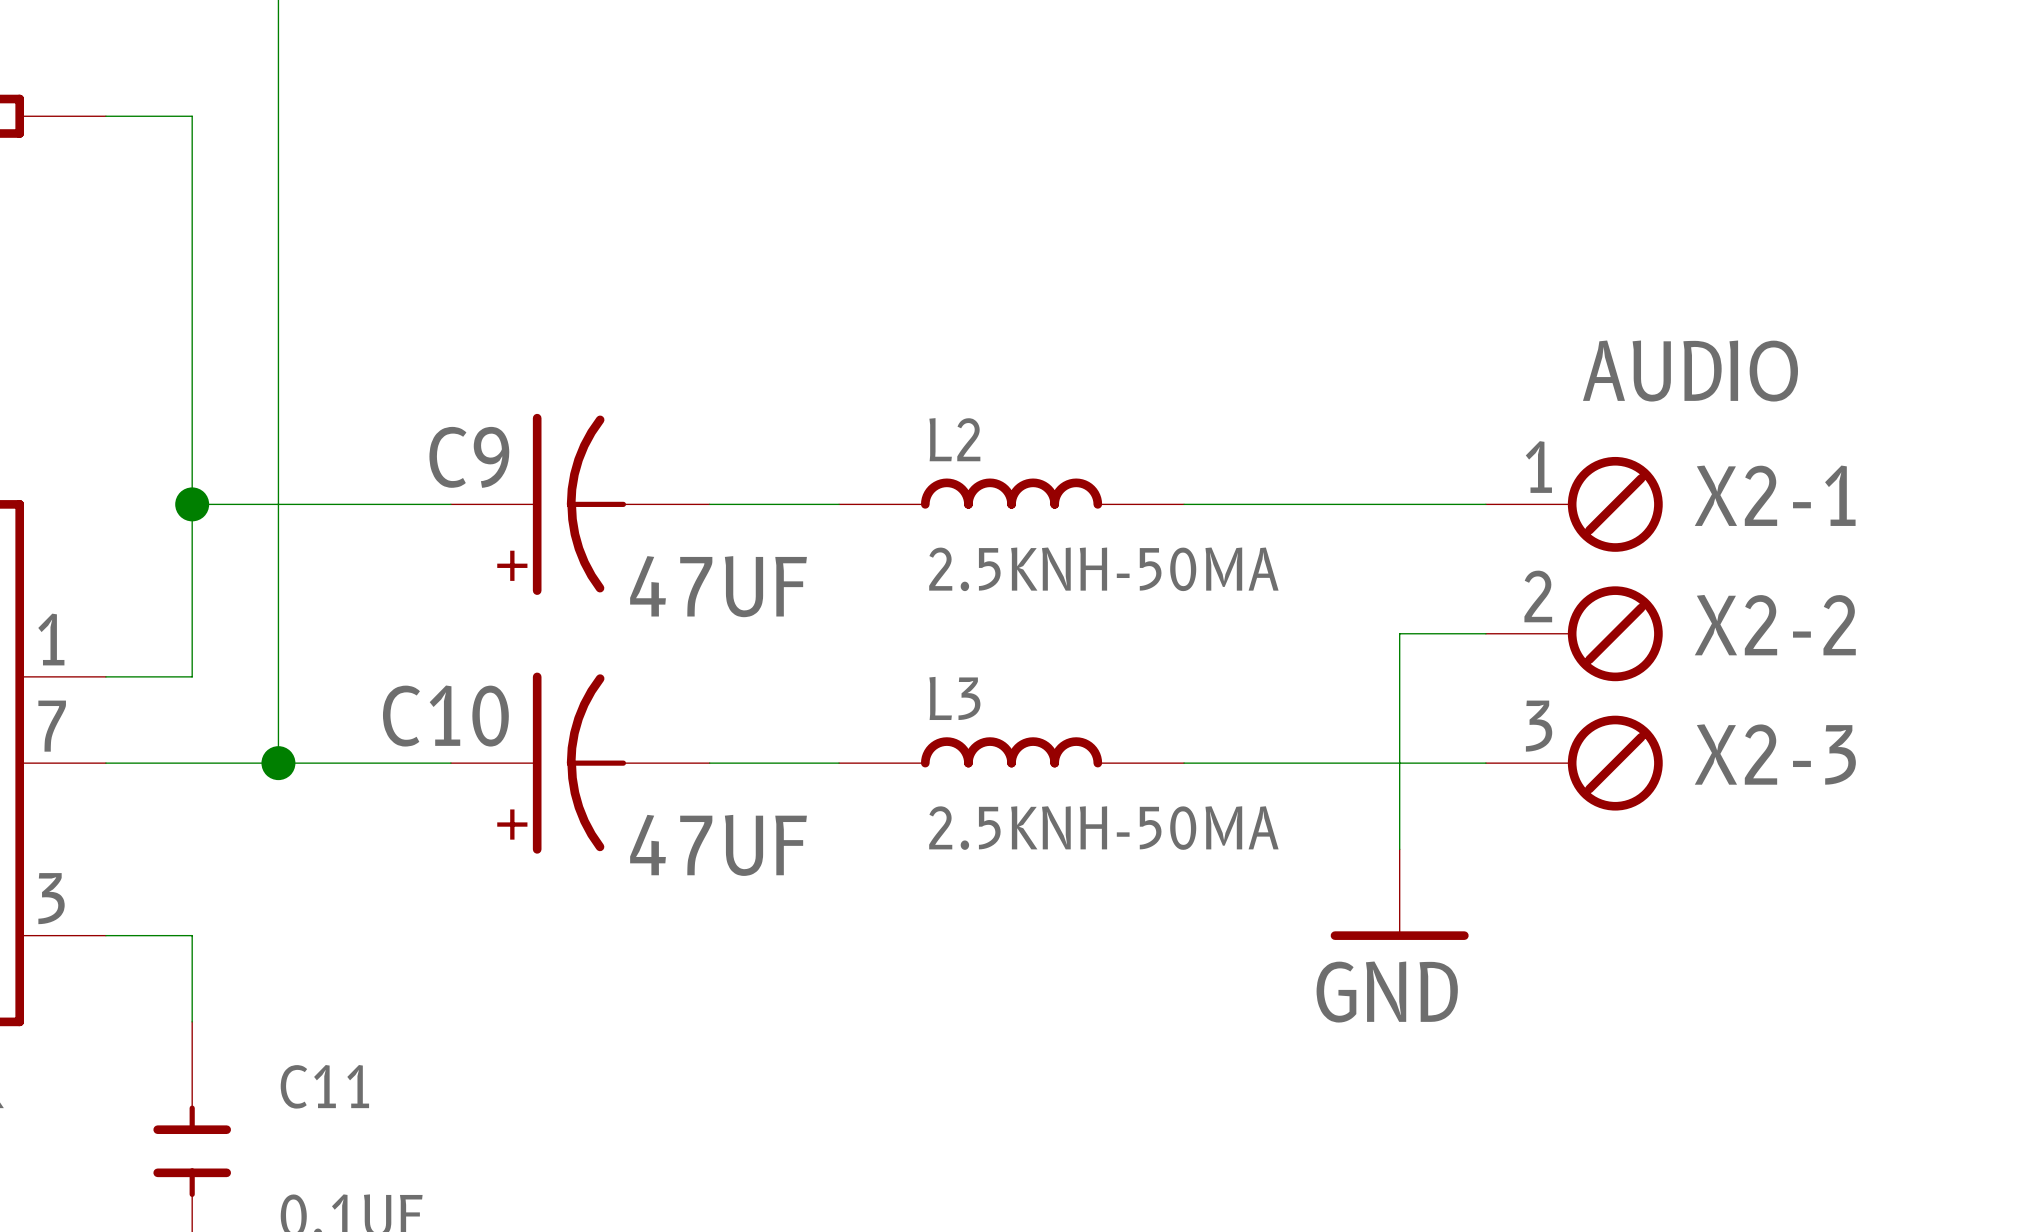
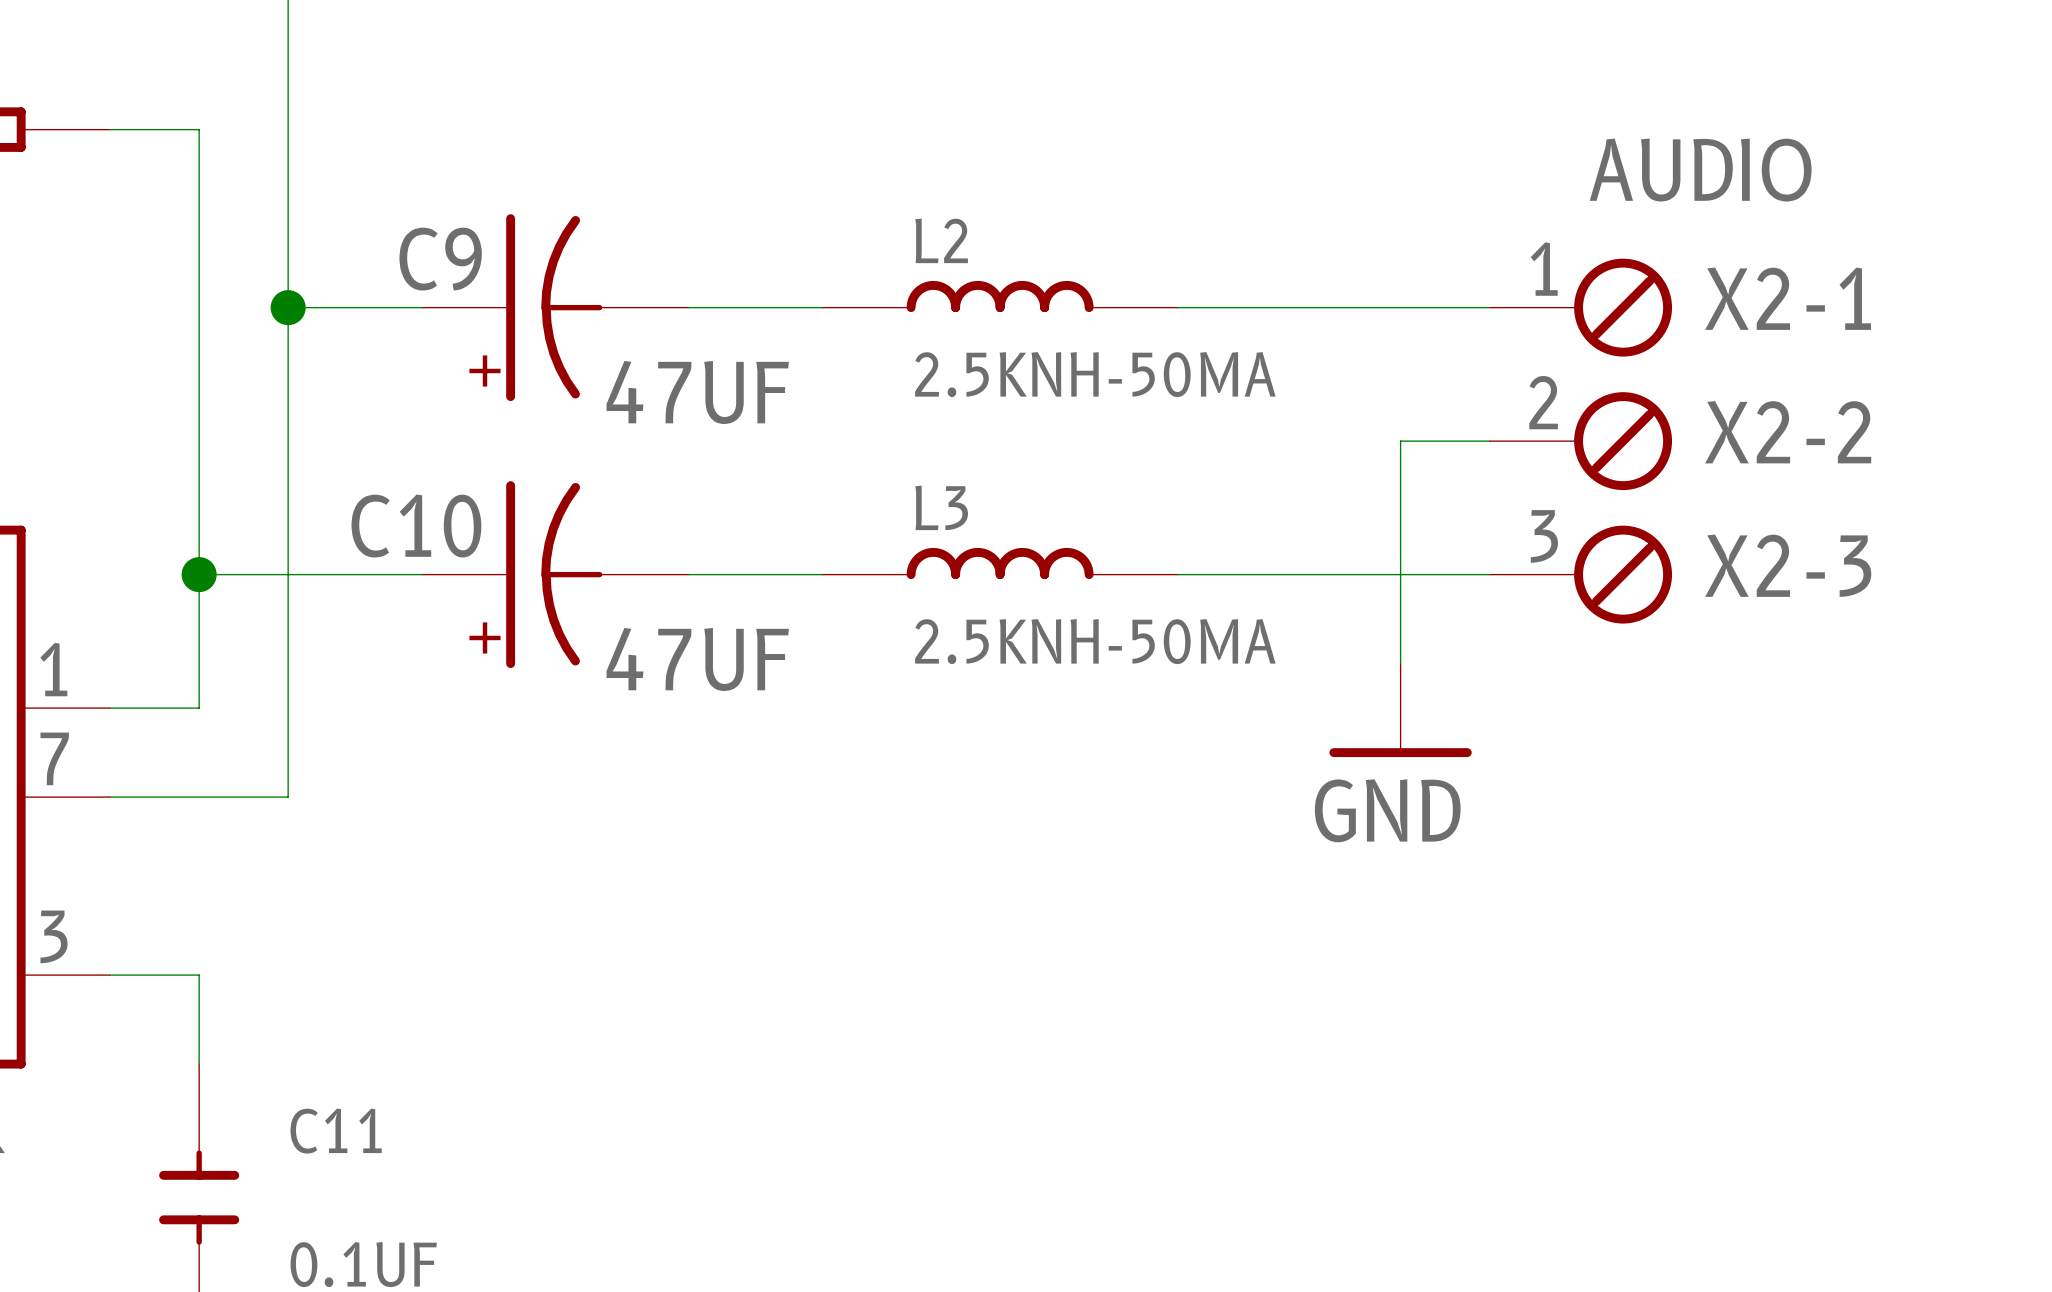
wire: none -> (288, 307) (421, 307)
junction: none -> (288, 307)
L2 position: (1011, 493) -> (1000, 296)
wire: (192, 504) (450, 504) -> none
junction position: (192, 504) -> (199, 574)
C9 position: (580, 504) -> (555, 307)
wire: (709, 504) (839, 504) -> (688, 307) (822, 307)
wire: (1184, 504) (1485, 504) -> (1178, 307) (1489, 307)
X2-1 position: (1574, 504) -> (1580, 307)
wire: none -> (199, 574) (421, 574)
wire: (1485, 633) (1399, 633) (1399, 849) -> (1489, 441) (1400, 441) (1400, 663)
X2-2 position: (1574, 633) -> (1580, 441)
L3 position: (1011, 752) -> (1000, 563)
wire: (278, 763) (450, 763) -> none
junction: (278, 763) -> none
C10 position: (580, 763) -> (555, 574)
wire: (709, 763) (839, 763) -> (688, 574) (822, 574)
wire: (1184, 763) (1485, 763) -> (1178, 574) (1489, 574)
X2-3 position: (1574, 763) -> (1580, 574)
power symbol position: GND (1399, 894) -> GND (1400, 710)

